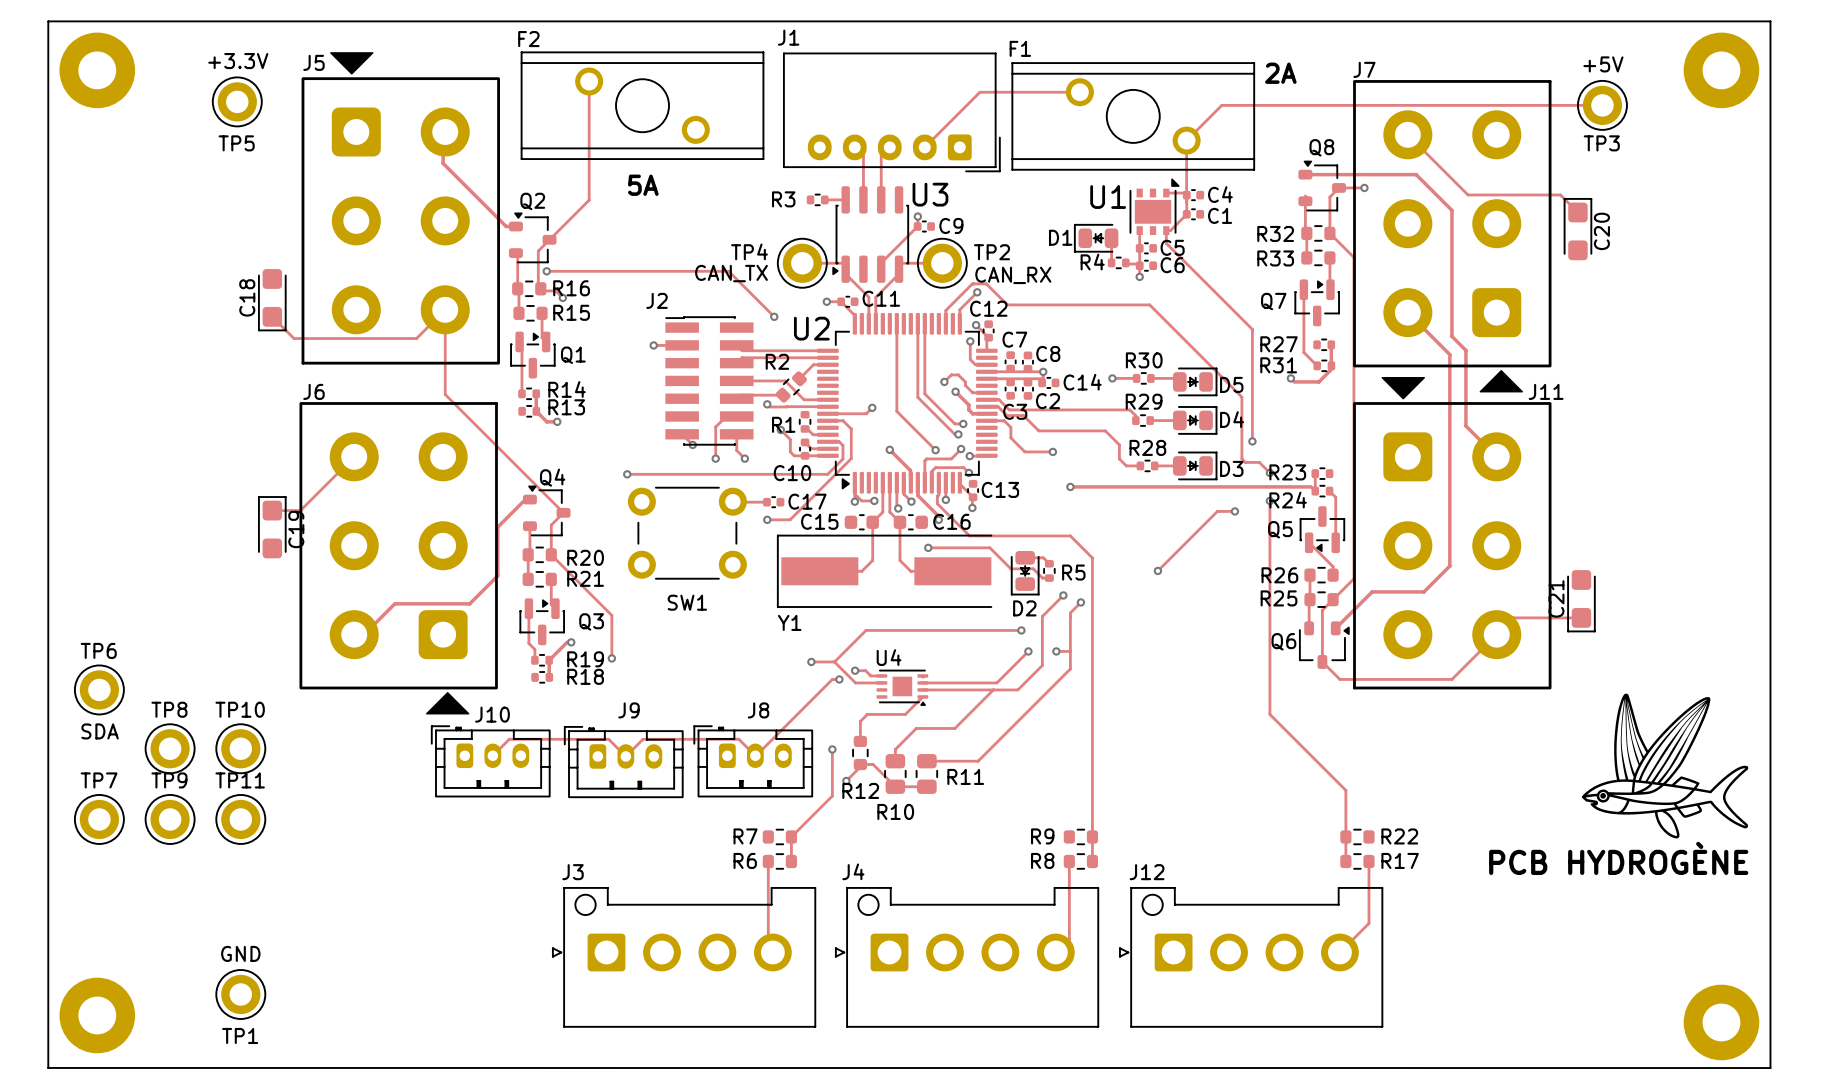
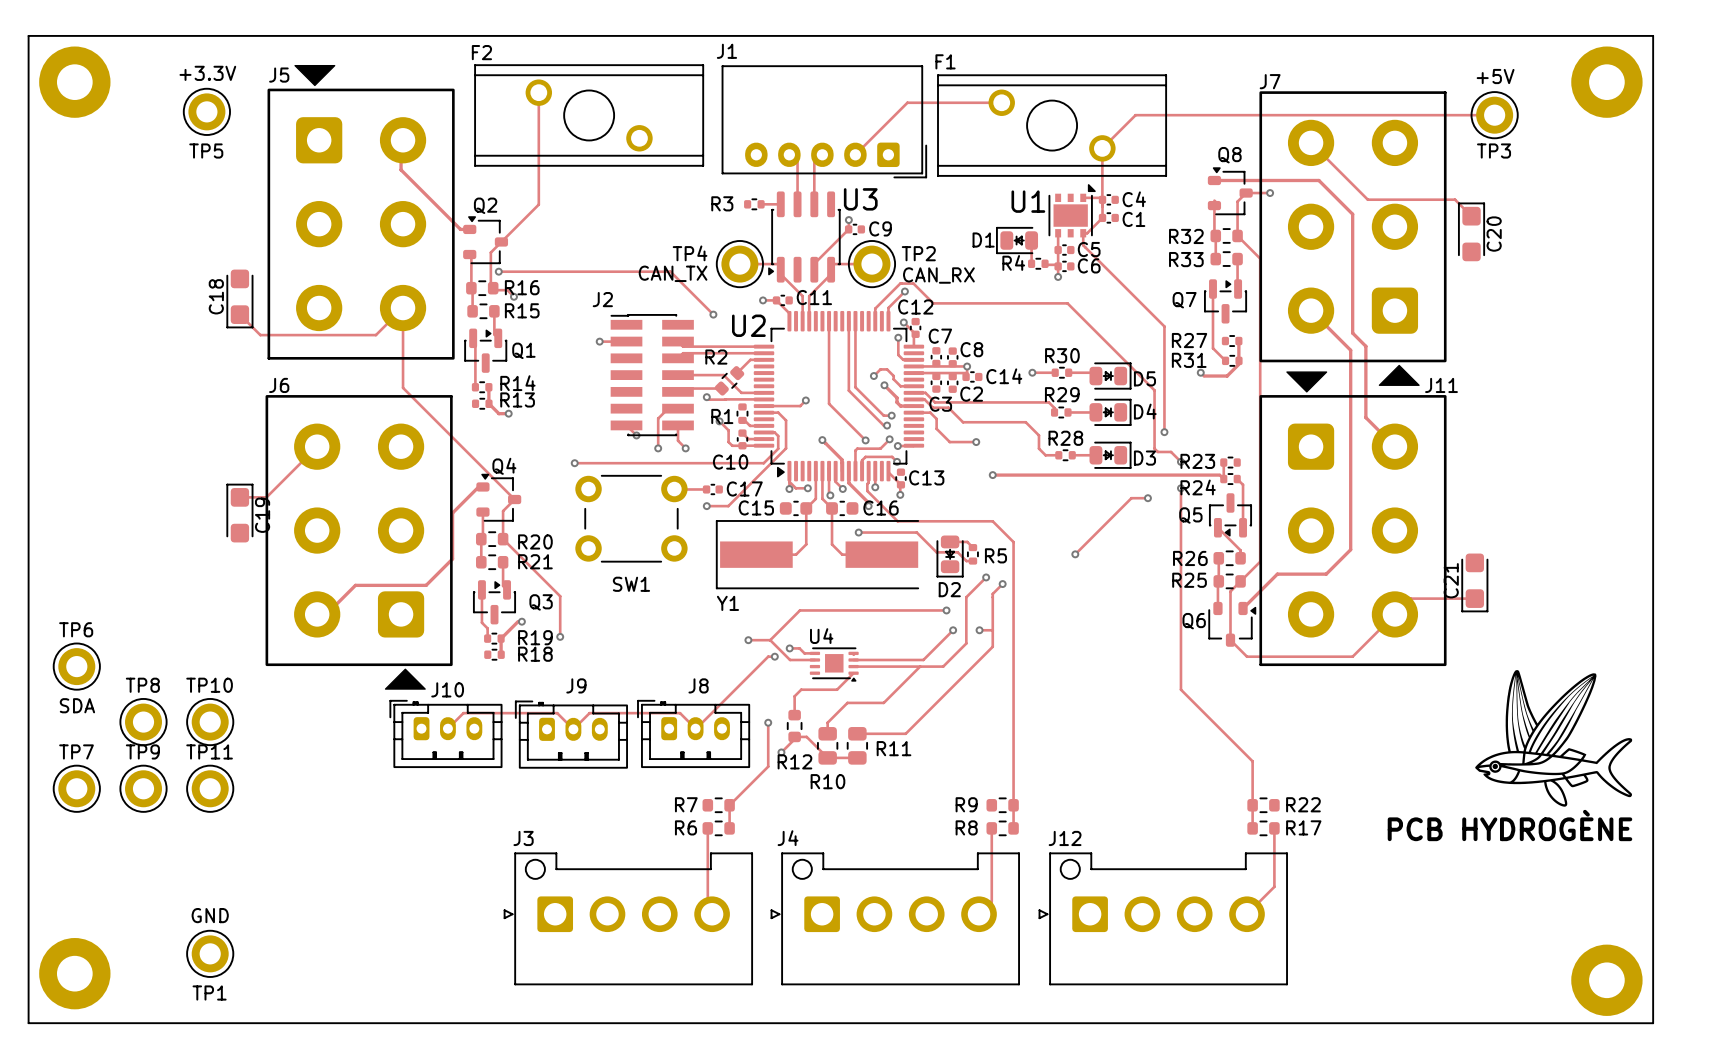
F1 value: 2A (1280, 73) -> none
F2 value: 5A (643, 185) -> none

